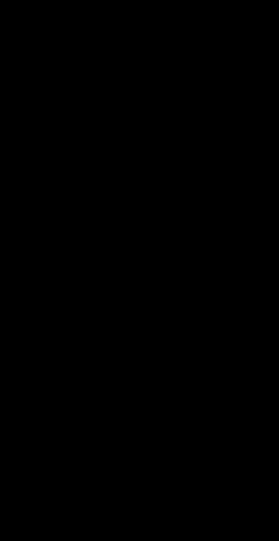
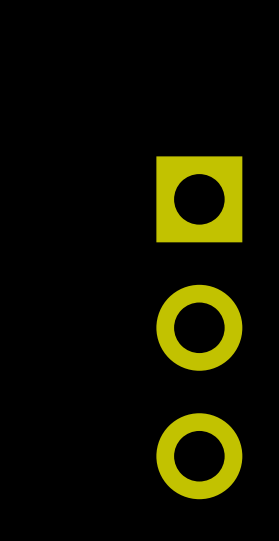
part: none -> (199, 327)

